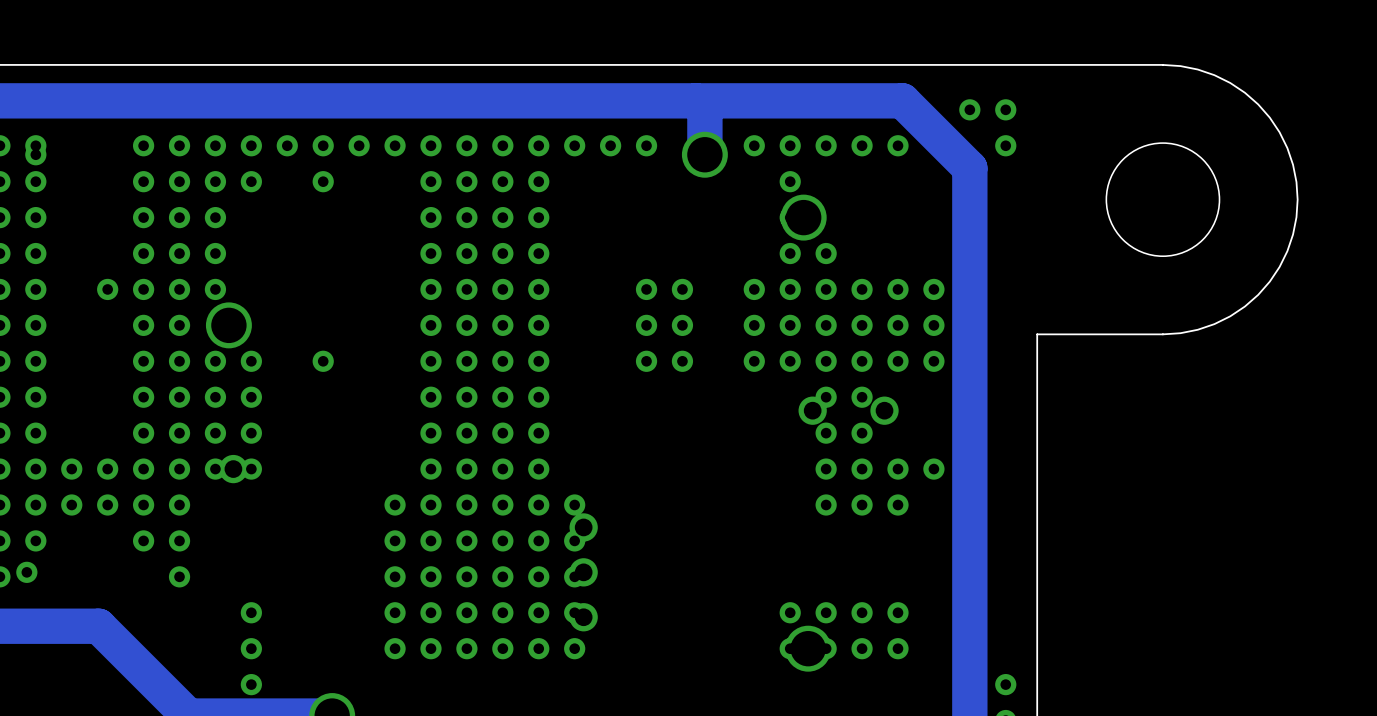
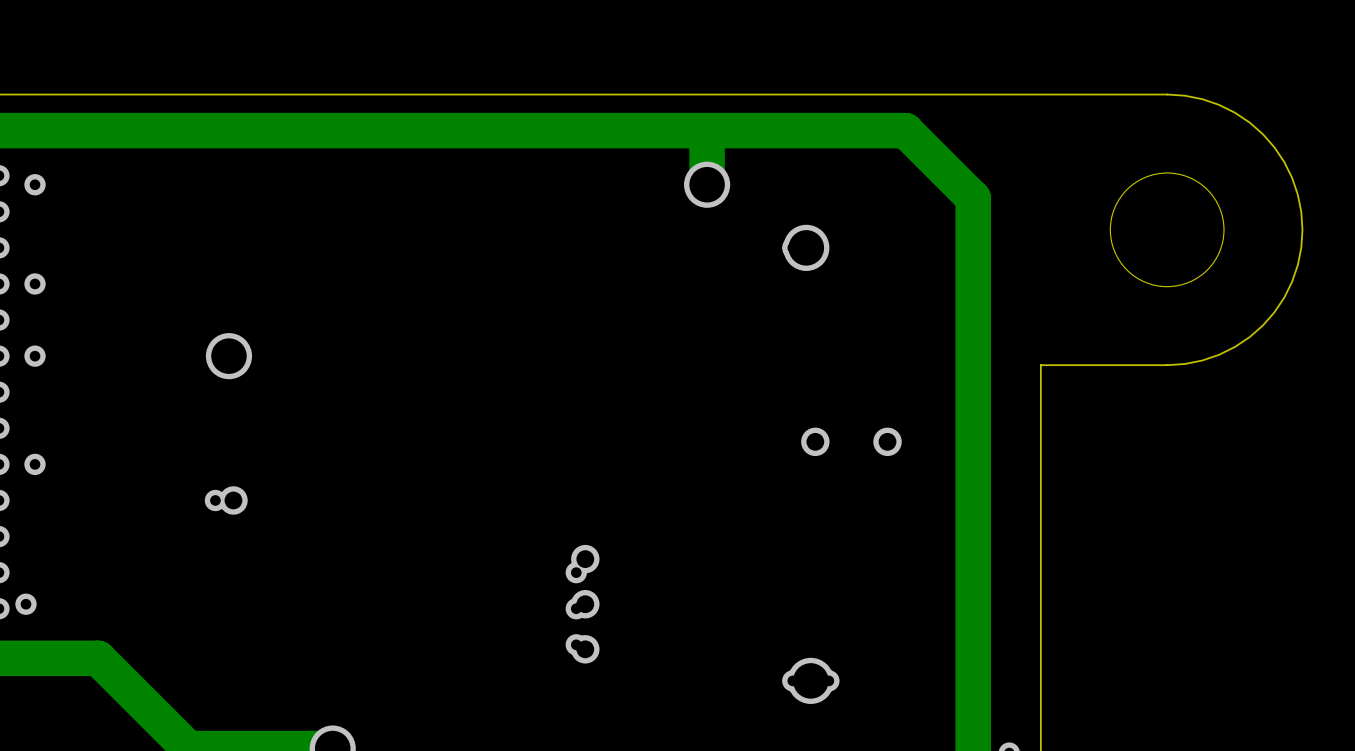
via: (969, 109) -> none
via: (1005, 109) -> none
via: (35, 145) -> none
via: (143, 145) -> none
via: (179, 145) -> none
via: (215, 145) -> none
via: (251, 145) -> none
via: (287, 145) -> none
via: (323, 145) -> none
via: (359, 145) -> none
via: (395, 145) -> none
via: (430, 145) -> none
via: (466, 145) -> none
via: (502, 145) -> none
via: (538, 145) -> none
via: (574, 145) -> none
via: (610, 145) -> none
via: (646, 145) -> none
via: (754, 145) -> none
via: (790, 145) -> none
via: (826, 145) -> none
via: (862, 145) -> none
via: (897, 145) -> none
via: (1005, 145) -> none
via: (35, 181) -> none
via: (143, 181) -> none
via: (179, 181) -> none
via: (215, 181) -> none
via: (251, 181) -> none
via: (323, 181) -> none
via: (430, 181) -> none
via: (466, 181) -> none
via: (502, 181) -> none
via: (538, 181) -> none
via: (790, 181) -> none
via: (35, 217) -> none
via: (143, 217) -> none
via: (179, 217) -> none
via: (215, 217) -> none
via: (430, 217) -> none
via: (466, 217) -> none
via: (502, 217) -> none
via: (538, 217) -> none
via: (143, 253) -> none
via: (179, 253) -> none
via: (215, 253) -> none
via: (430, 253) -> none
via: (466, 253) -> none
via: (502, 253) -> none
via: (538, 253) -> none
via: (790, 253) -> none
via: (826, 253) -> none
via: (35, 289) -> none
via: (107, 289) -> none
via: (143, 289) -> none
via: (179, 289) -> none
via: (215, 289) -> none
via: (430, 289) -> none
via: (466, 289) -> none
via: (502, 289) -> none
via: (538, 289) -> none
via: (646, 289) -> none
via: (682, 289) -> none
via: (754, 289) -> none
via: (790, 289) -> none
via: (826, 289) -> none
via: (862, 289) -> none
via: (897, 289) -> none
via: (933, 289) -> none
via: (143, 325) -> none
via: (179, 325) -> none
via: (430, 325) -> none
via: (466, 325) -> none
via: (502, 325) -> none
via: (538, 325) -> none
via: (646, 325) -> none
via: (682, 325) -> none
via: (754, 325) -> none
via: (790, 325) -> none
via: (826, 325) -> none
via: (862, 325) -> none
via: (897, 325) -> none
via: (933, 325) -> none
via: (35, 361) -> none
via: (143, 361) -> none
via: (179, 361) -> none
via: (215, 361) -> none
via: (251, 361) -> none
via: (323, 361) -> none
via: (430, 361) -> none
via: (466, 361) -> none
via: (502, 361) -> none
via: (538, 361) -> none
via: (646, 361) -> none
via: (682, 361) -> none
via: (754, 361) -> none
via: (790, 361) -> none
via: (826, 361) -> none
via: (862, 361) -> none
via: (897, 361) -> none
via: (933, 361) -> none
via: (35, 397) -> none
via: (143, 397) -> none
via: (179, 397) -> none
via: (215, 397) -> none
via: (251, 397) -> none
via: (430, 397) -> none
via: (466, 397) -> none
via: (502, 397) -> none
via: (538, 397) -> none
via: (826, 397) -> none
via: (862, 397) -> none
via: (143, 433) -> none
via: (179, 433) -> none
via: (215, 433) -> none
via: (251, 433) -> none
via: (430, 433) -> none
via: (466, 433) -> none
via: (502, 433) -> none
via: (538, 433) -> none
via: (826, 433) -> none
via: (862, 433) -> none
via: (35, 469) -> none
via: (71, 469) -> none
via: (107, 469) -> none
via: (143, 469) -> none
via: (179, 469) -> none
via: (251, 469) -> none
via: (430, 469) -> none
via: (466, 469) -> none
via: (502, 469) -> none
via: (538, 469) -> none
via: (826, 469) -> none
via: (862, 469) -> none
via: (897, 469) -> none
via: (933, 469) -> none
via: (35, 504) -> none
via: (71, 504) -> none
via: (107, 504) -> none
via: (143, 504) -> none
via: (179, 504) -> none
via: (395, 504) -> none
via: (430, 504) -> none
via: (466, 504) -> none
via: (502, 504) -> none
via: (538, 504) -> none
via: (574, 504) -> none
via: (826, 504) -> none
via: (862, 504) -> none
via: (897, 504) -> none
via: (35, 540) -> none
via: (143, 540) -> none
via: (179, 540) -> none
via: (395, 540) -> none
via: (430, 540) -> none
via: (466, 540) -> none
via: (502, 540) -> none
via: (538, 540) -> none
via: (179, 576) -> none
via: (395, 576) -> none
via: (430, 576) -> none
via: (466, 576) -> none
via: (502, 576) -> none
via: (538, 576) -> none
via: (251, 612) -> none
via: (395, 612) -> none
via: (430, 612) -> none
via: (466, 612) -> none
via: (502, 612) -> none
via: (538, 612) -> none
via: (790, 612) -> none
via: (826, 612) -> none
via: (862, 612) -> none
via: (897, 612) -> none
via: (251, 648) -> none
via: (395, 648) -> none
via: (430, 648) -> none
via: (466, 648) -> none
via: (502, 648) -> none
via: (538, 648) -> none
via: (574, 648) -> none
via: (862, 648) -> none
via: (897, 648) -> none
via: (251, 684) -> none
via: (1005, 684) -> none

